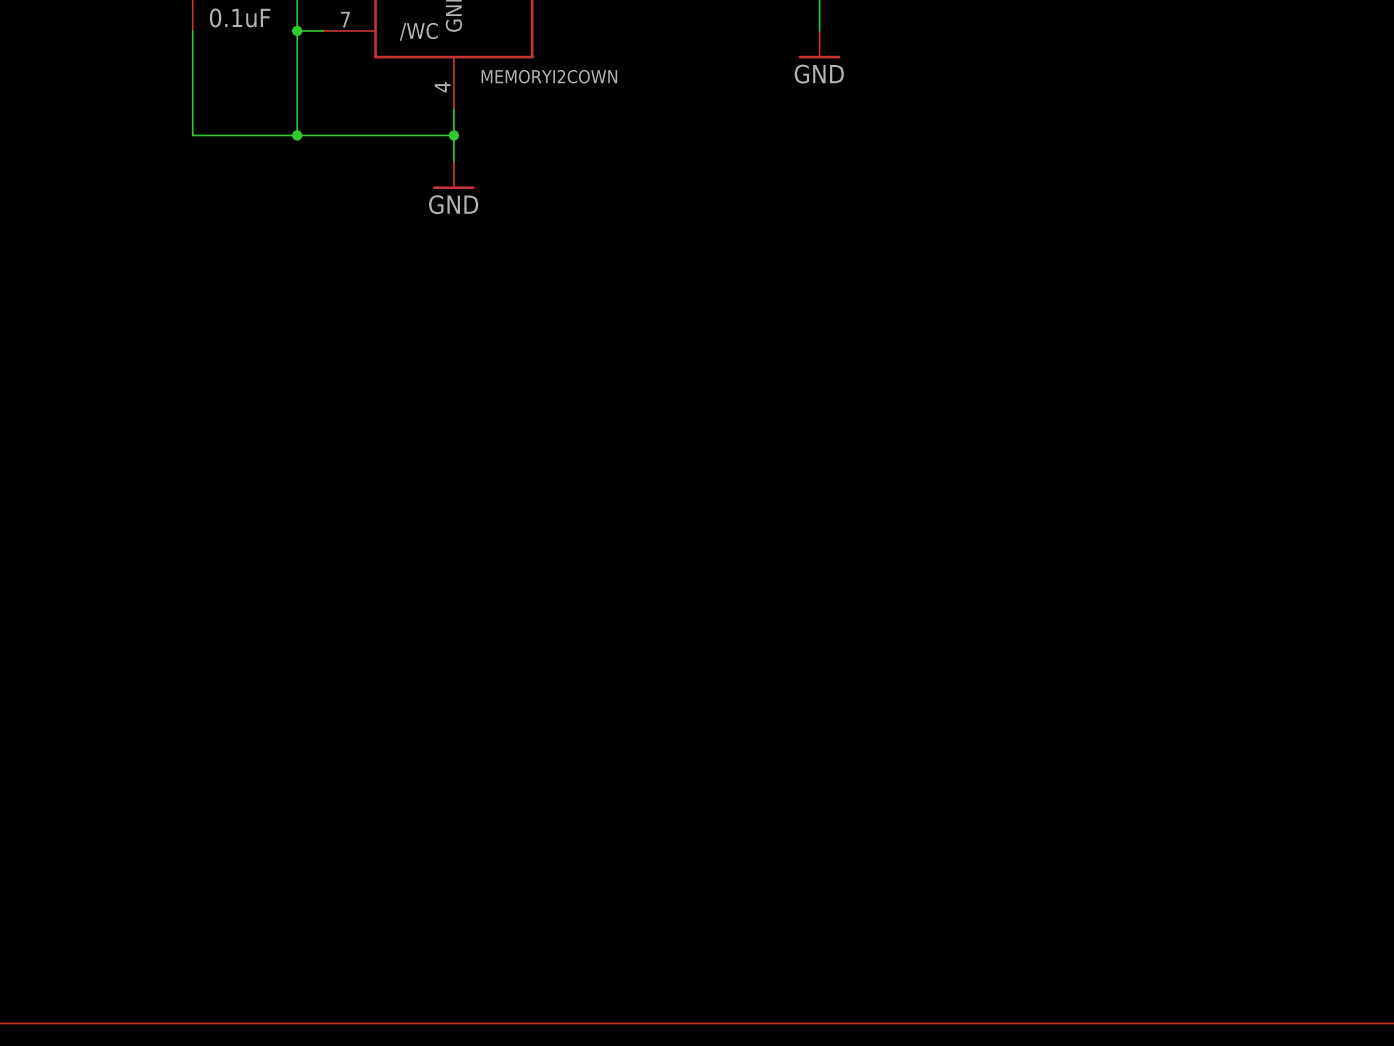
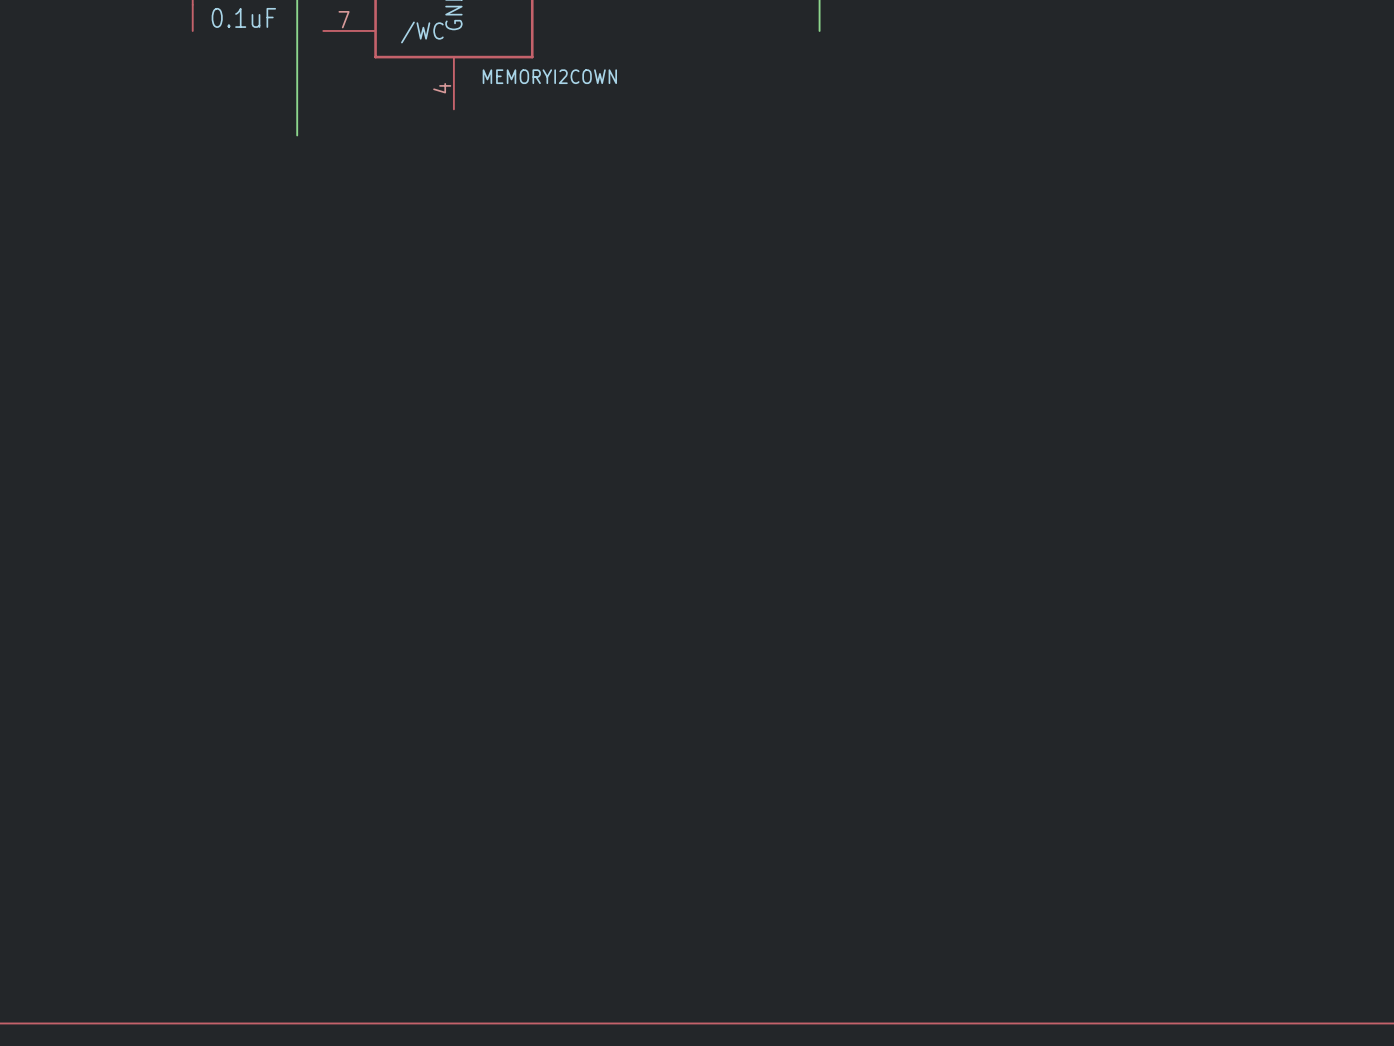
wire: (192, 30) (192, 135) (453, 135) -> none
wire: (297, 30) (323, 30) -> none
junction: (297, 30) -> none
power symbol: GND (819, 44) -> none
wire: (453, 109) (453, 161) -> none
junction: (297, 135) -> none
junction: (453, 135) -> none
power symbol: GND (453, 175) -> none

